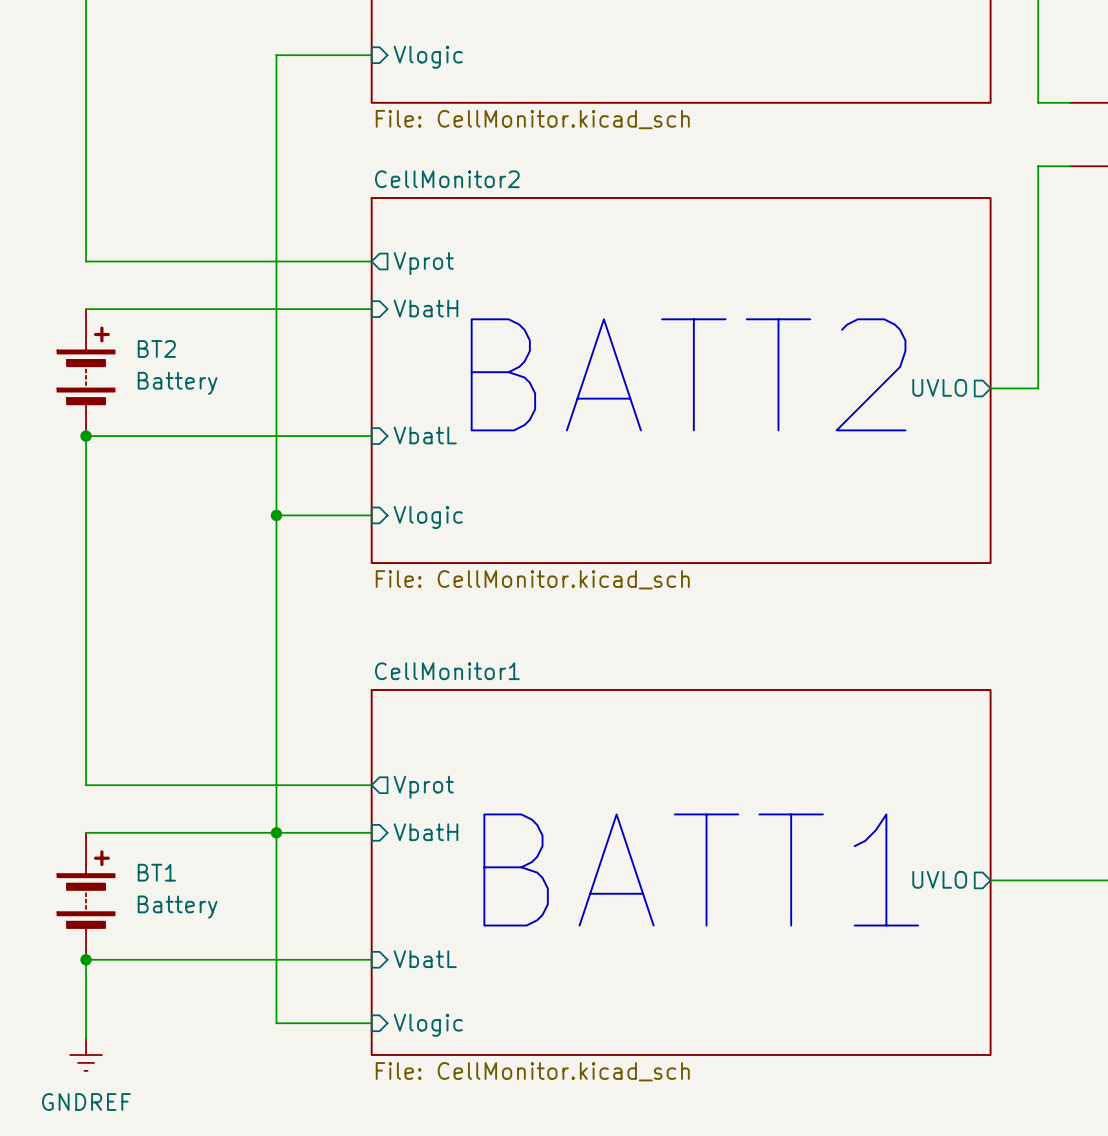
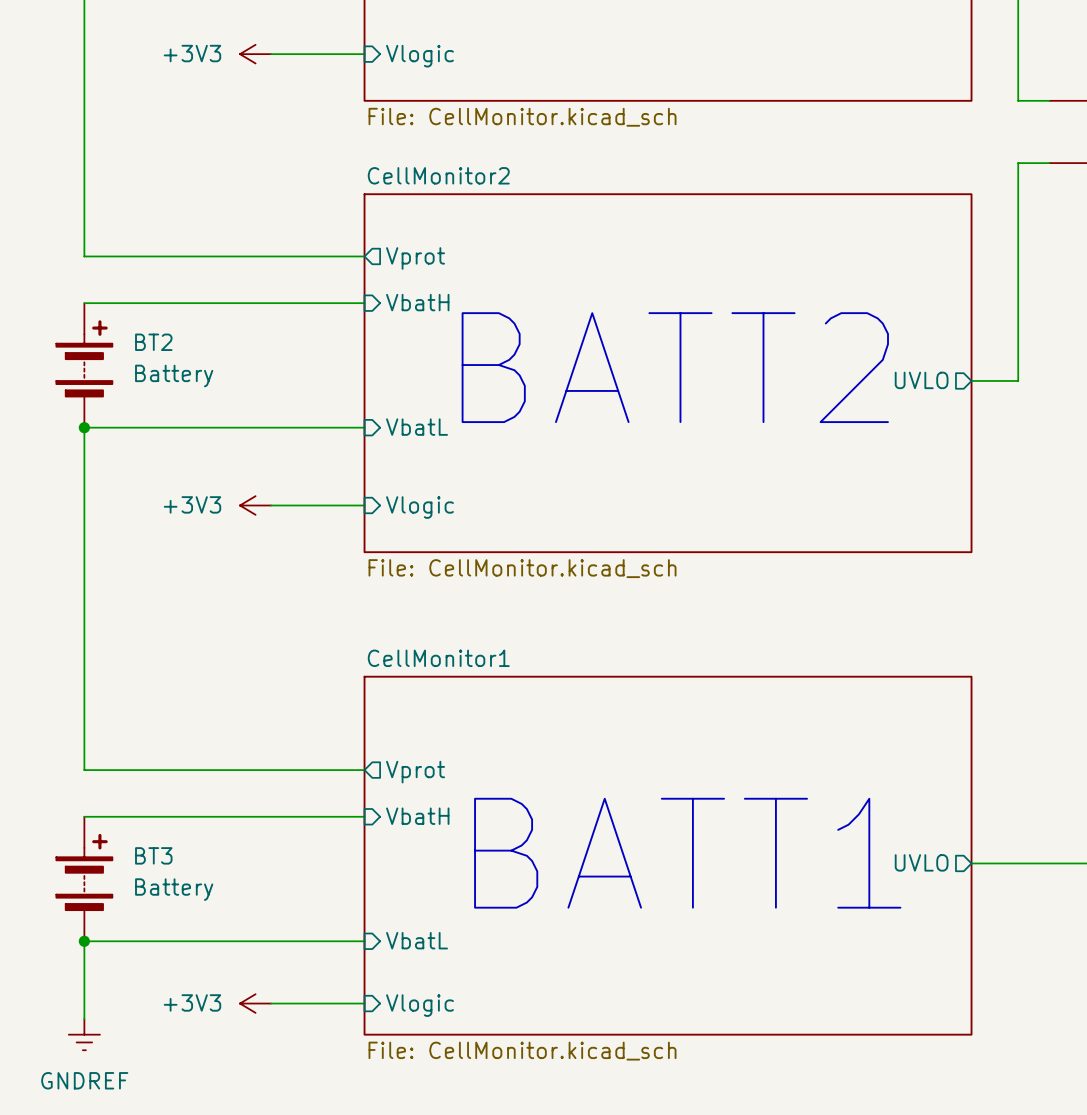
power symbol: none -> +3V3 (255, 54)
wire: (276, 55) (276, 1023) -> none
power symbol: none -> +3V3 (255, 505)
junction: (276, 515) -> none
junction: (276, 832) -> none
BT1 name: BT1 (156, 872) -> BT3 (153, 855)
power symbol: none -> +3V3 (255, 1003)

